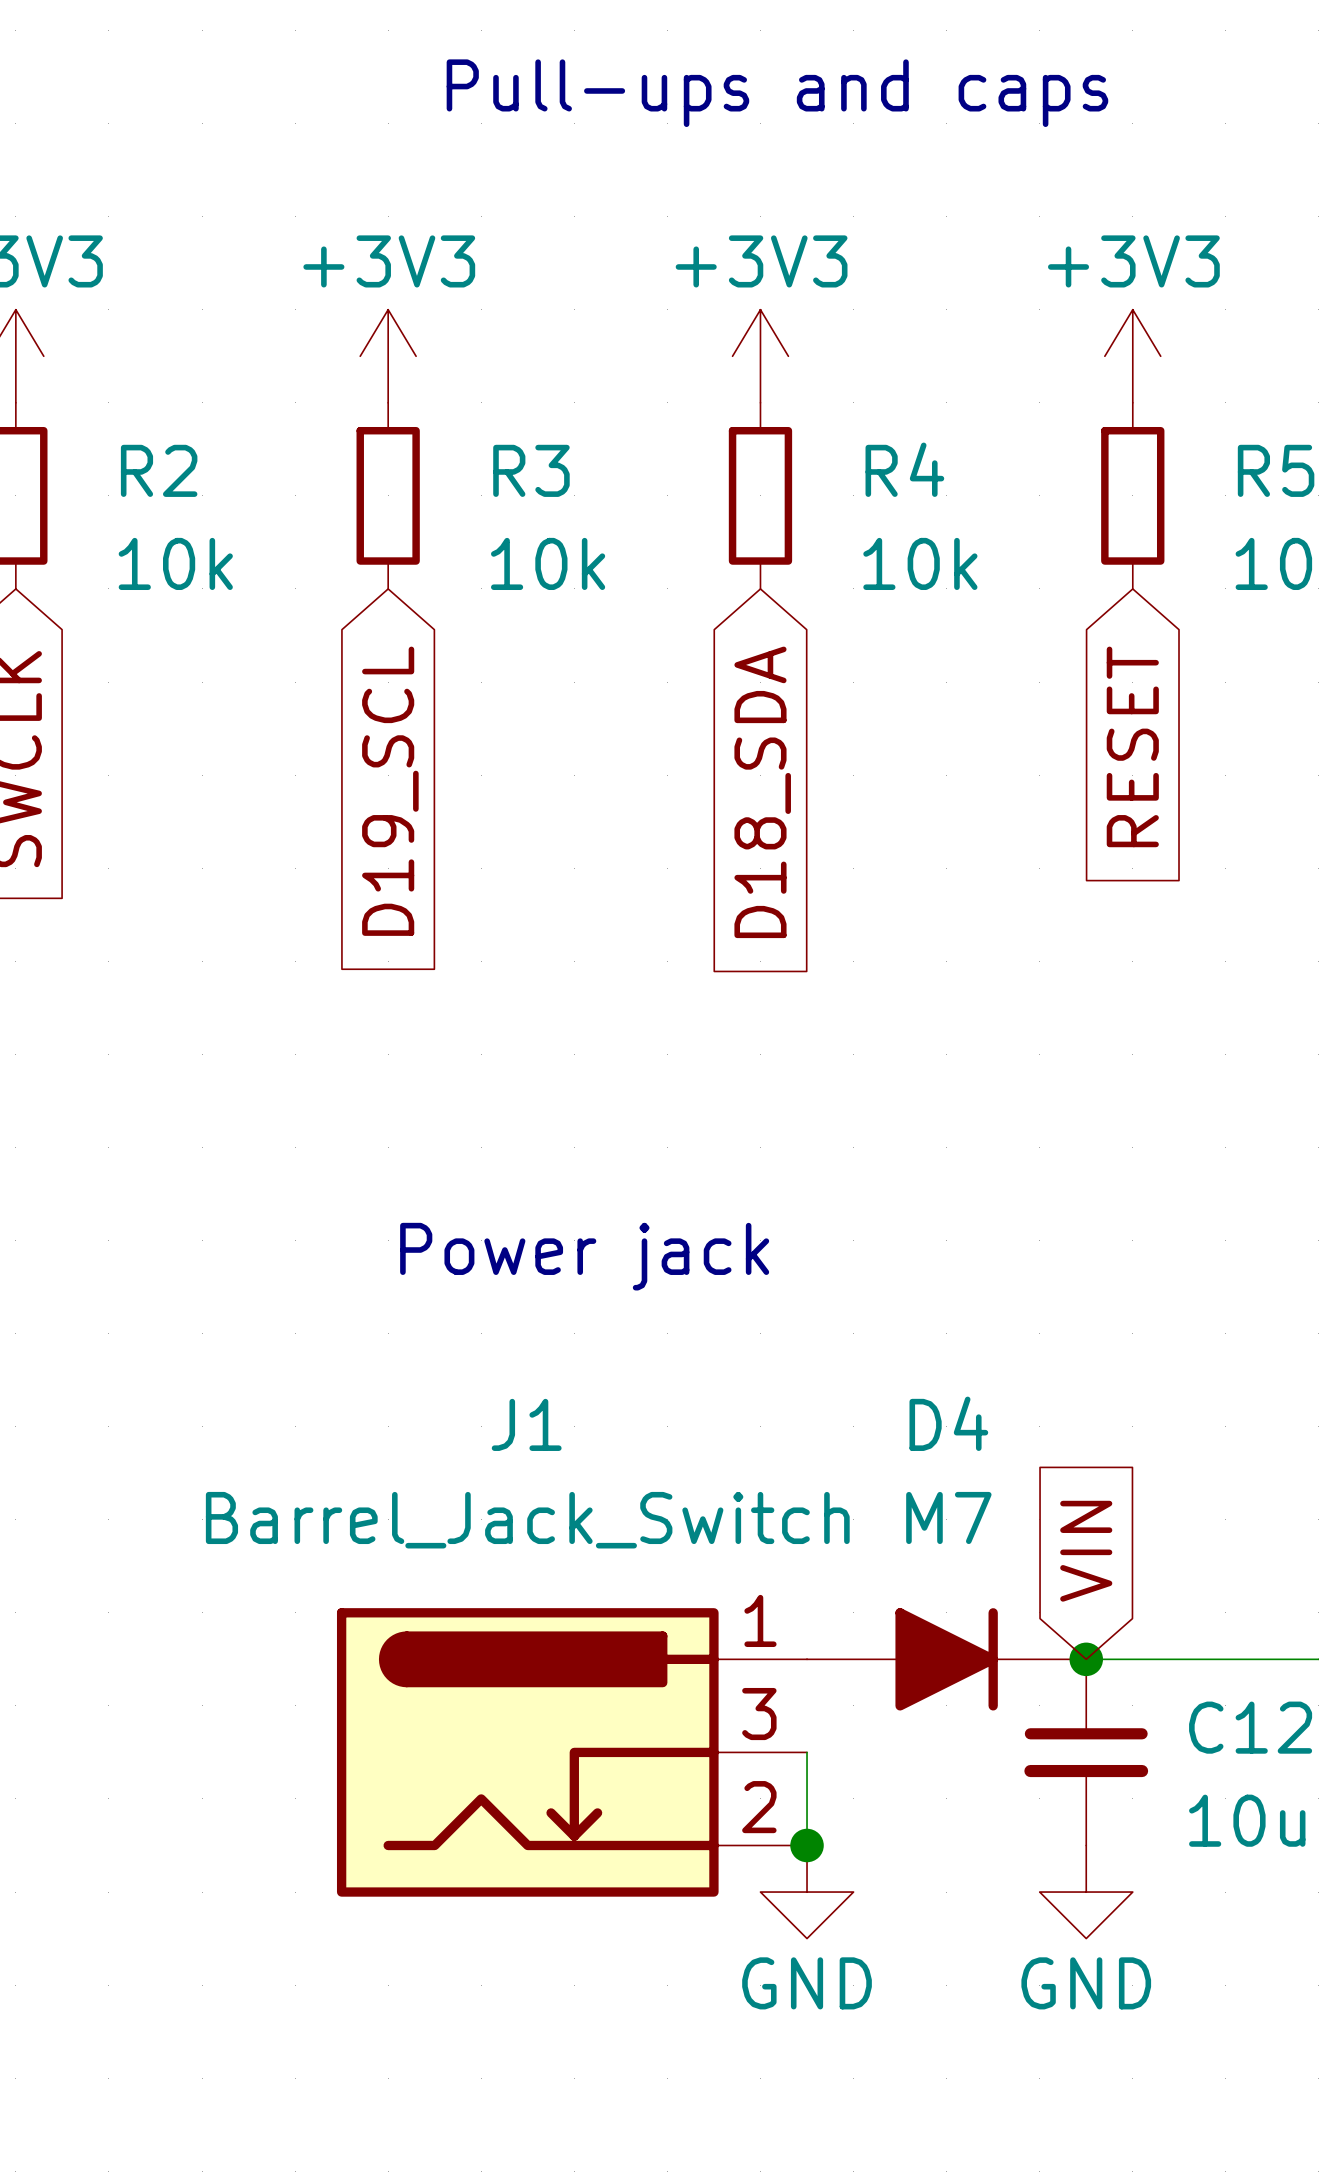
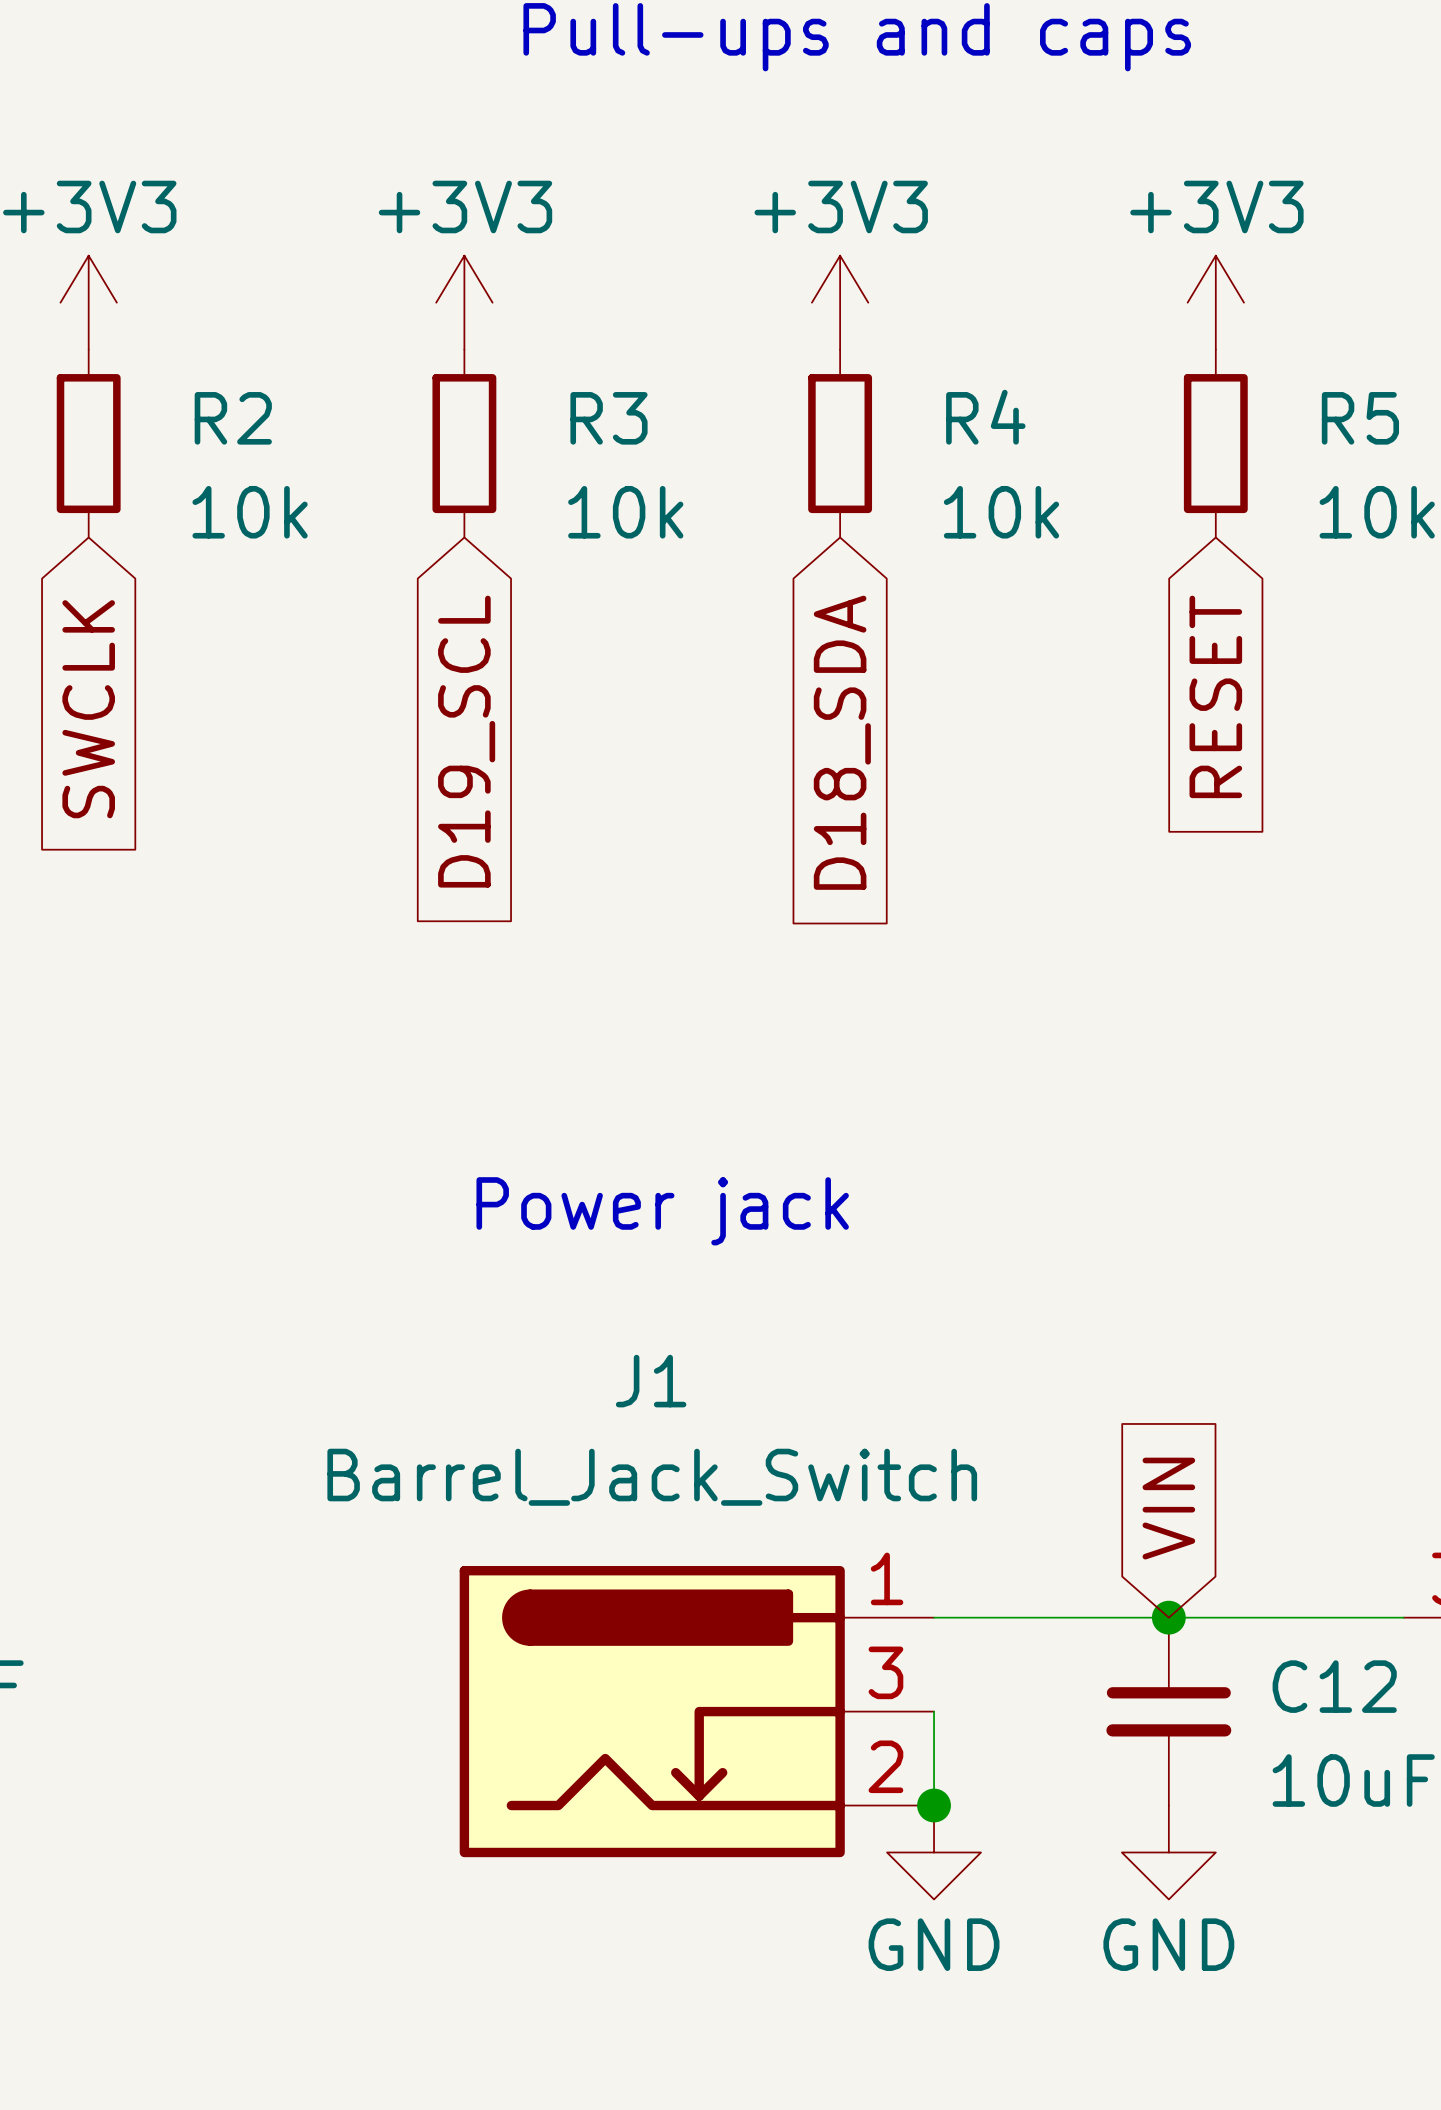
D4: M7 (946, 1659) -> none
J1 position: (571, 1752) -> (696, 1711)
wire: (807, 1752) (807, 1845) -> (934, 1711) (934, 1805)
junction position: (807, 1845) -> (934, 1805)
power symbol position: GND (807, 1892) -> GND (934, 1852)

